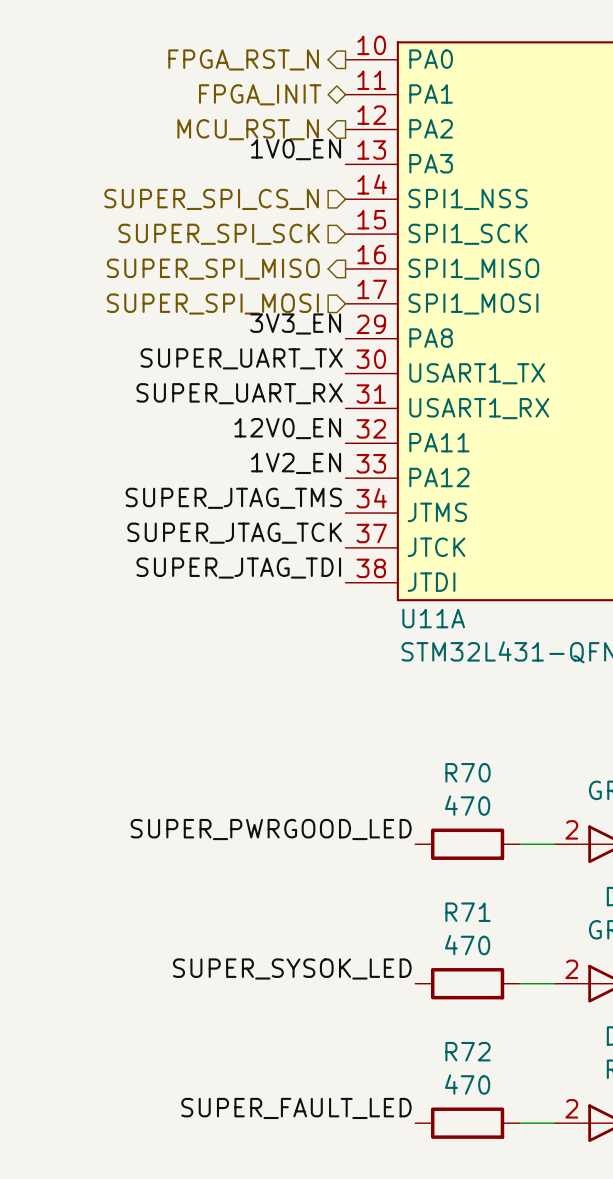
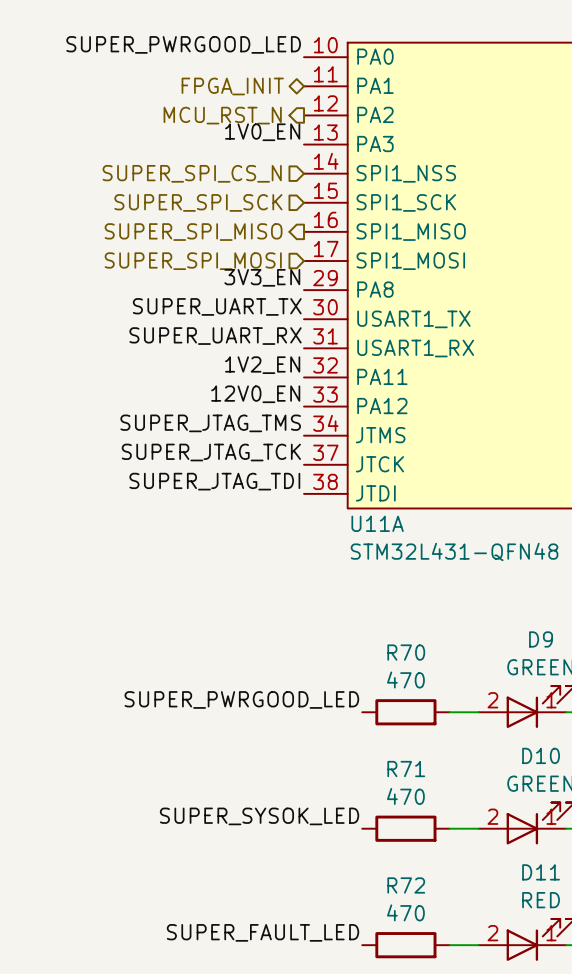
label: none -> SUPER_PWRGOOD_LED (183, 44)
hierarchical label: FPGA_RST_N (243, 59) -> none
label: 12V0_EN (287, 428) -> 1V2_EN (262, 365)
label: 1V2_EN (296, 463) -> 12V0_EN (255, 394)

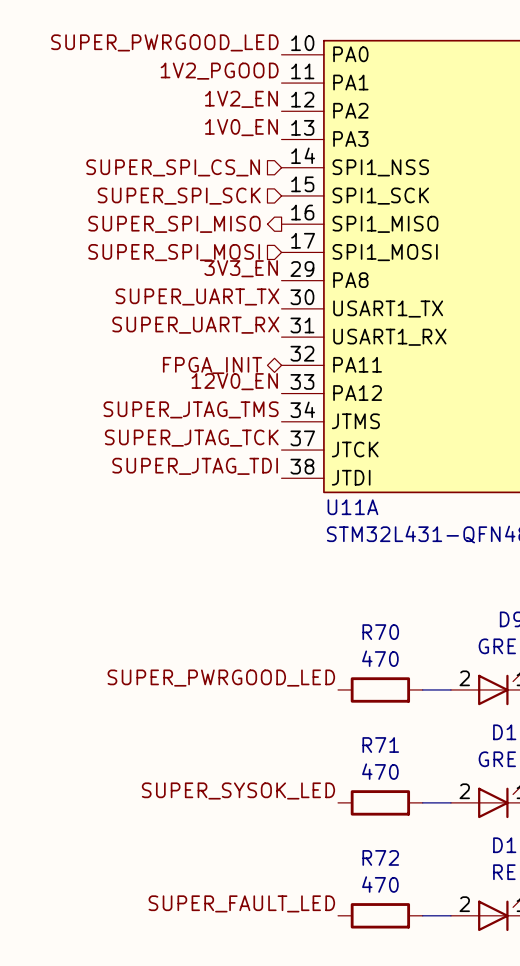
label: none -> 1V2_PGOOD (219, 71)
hierarchical label: FPGA_INIT (232, 86) -> none
hierarchical label: MCU_RST_N (222, 115) -> none
label position: 1V2_EN (262, 365) -> 1V2_EN (241, 99)
hierarchical label: none -> FPGA_INIT (212, 365)

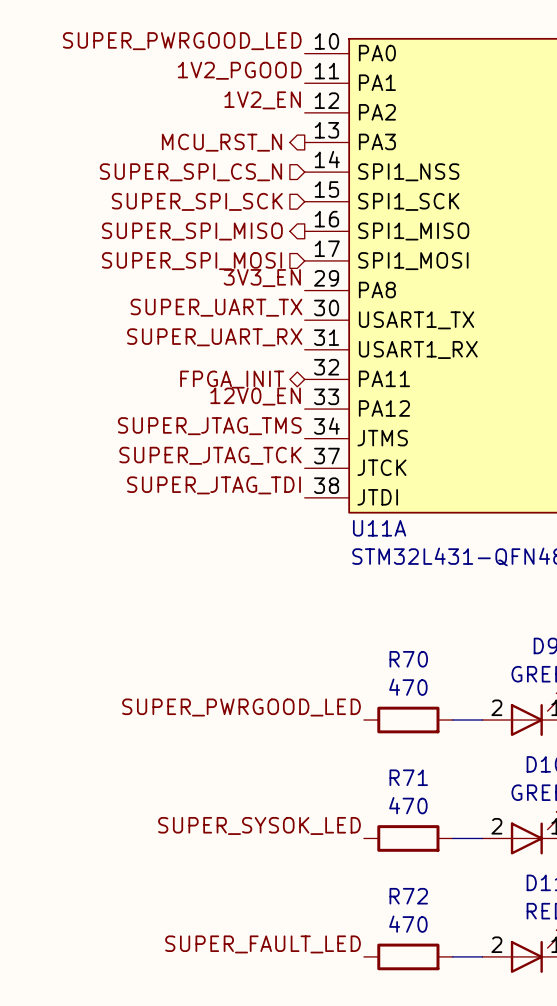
label: 1V0_EN (241, 127) -> none
hierarchical label: none -> MCU_RST_N (221, 142)

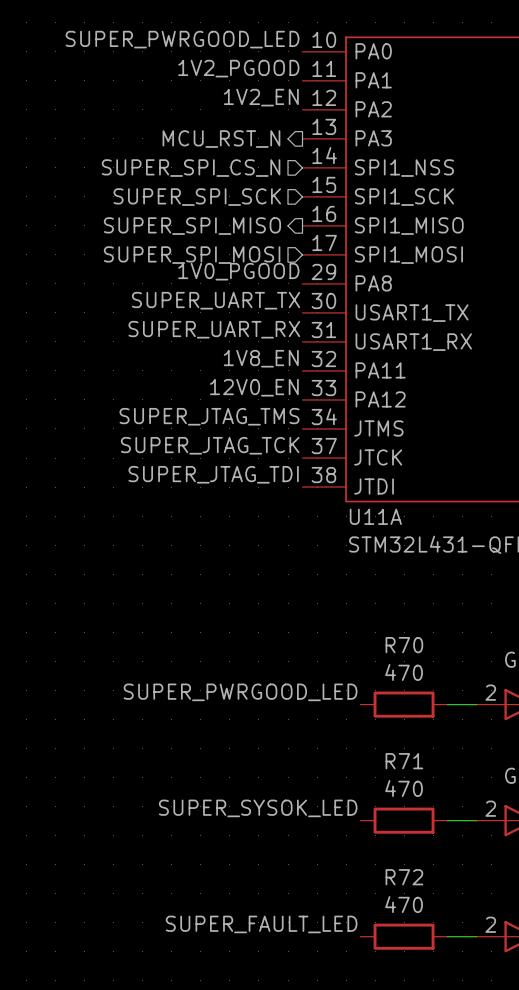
label: 3V3_EN (262, 278) -> 1V0_PGOOD (238, 271)
label: none -> 1V8_EN (261, 358)
hierarchical label: FPGA_INIT (232, 379) -> none

